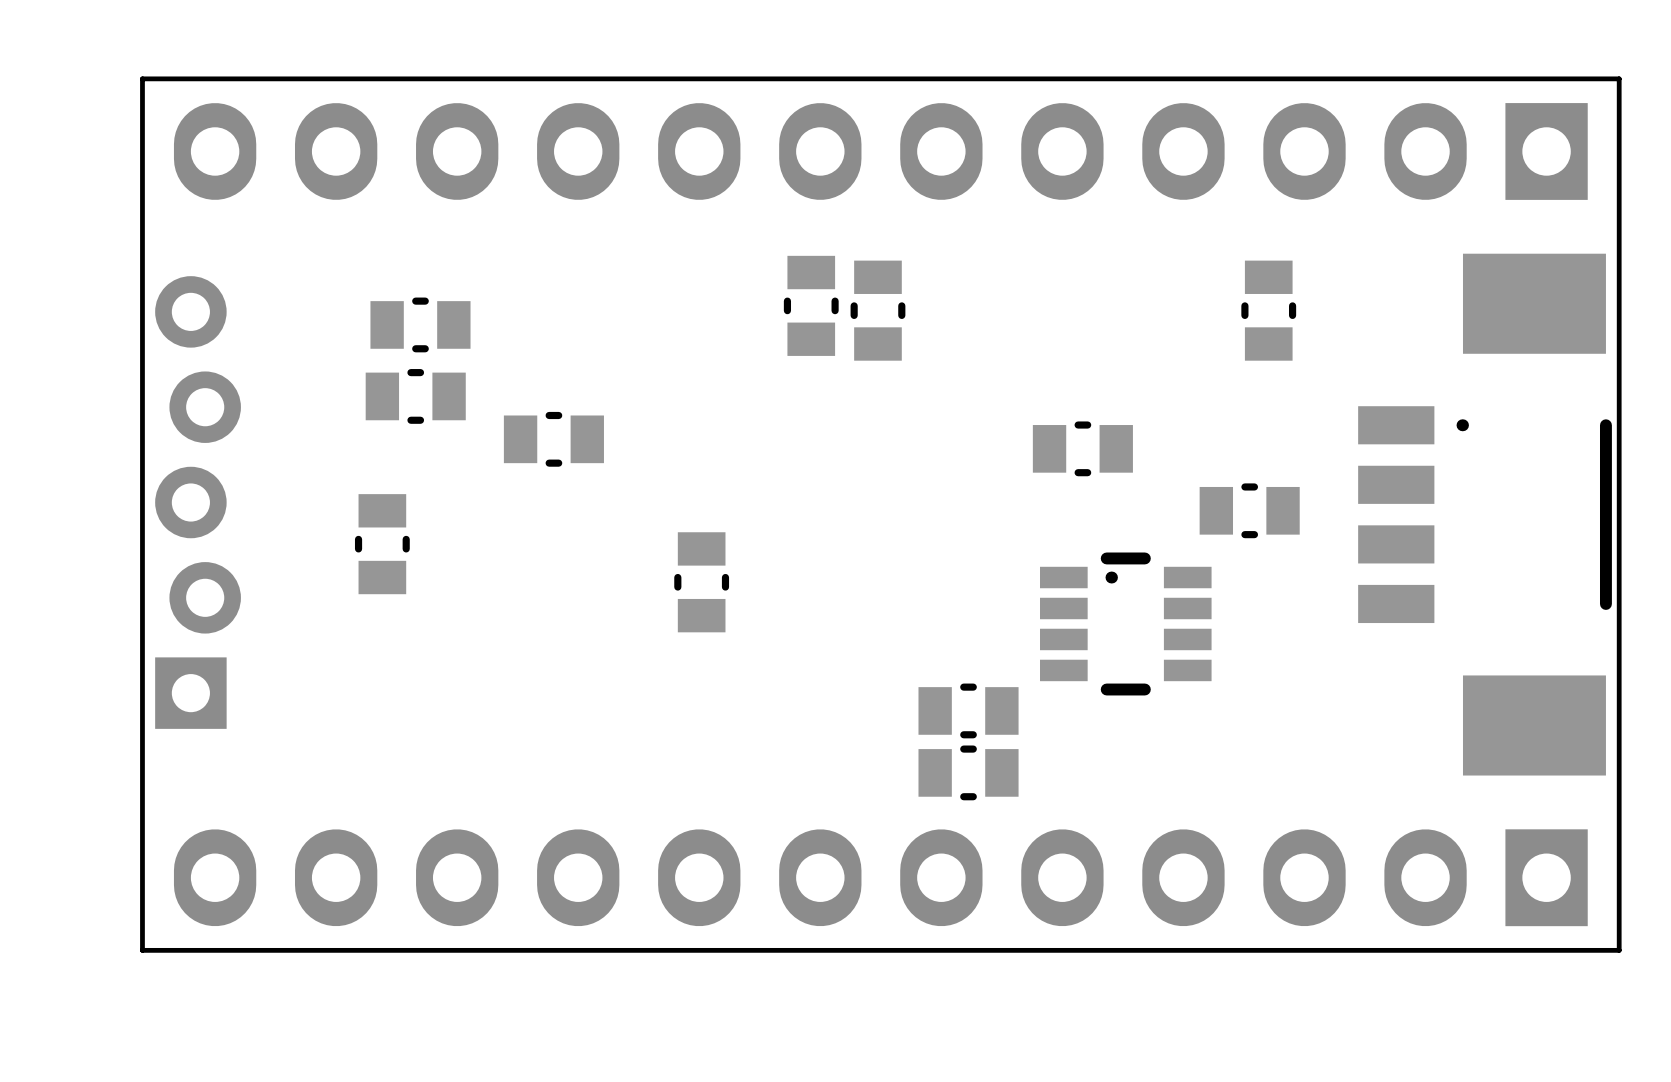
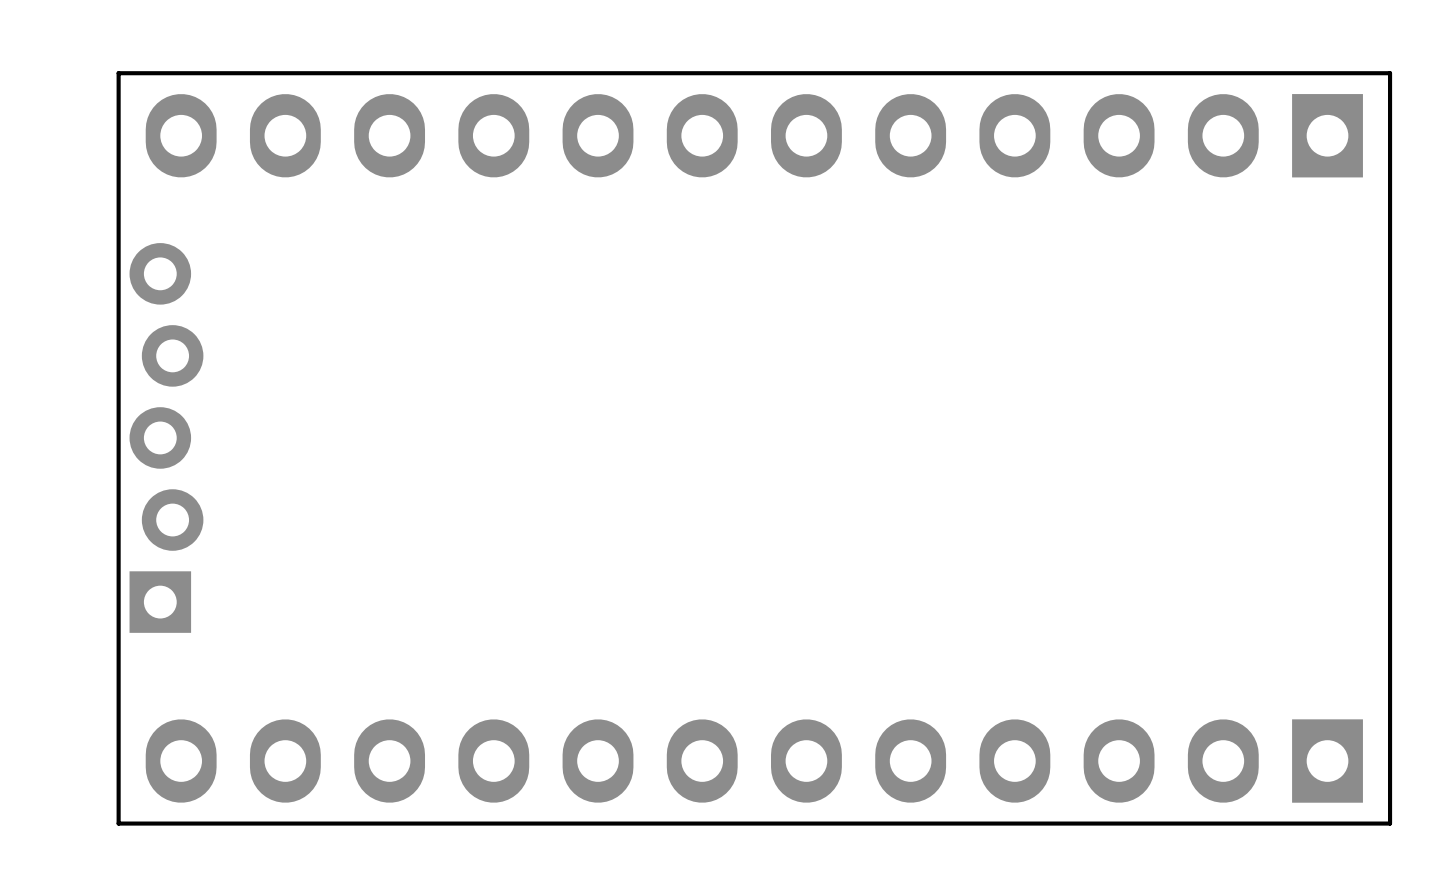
part: (811, 305) -> none
part: (877, 310) -> none
part: (1268, 310) -> none
part: (420, 324) -> none
part: (415, 396) -> none
part: (553, 439) -> none
part: (1082, 448) -> none
part: (1249, 510) -> none
part: (1485, 514) -> none
part: (382, 544) -> none
part: (701, 582) -> none
part: (1125, 623) -> none
part: (968, 710) -> none
part: (968, 772) -> none

